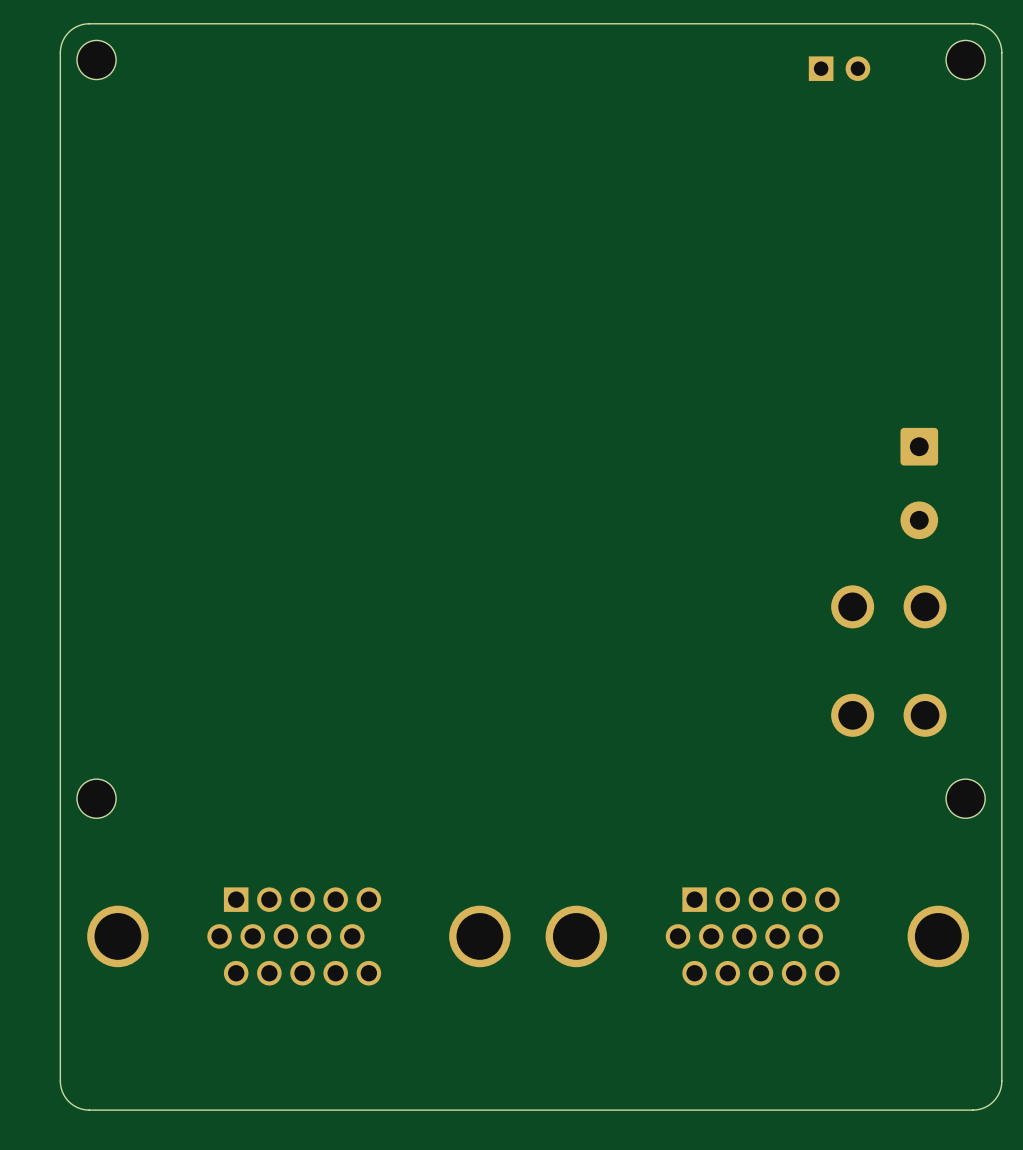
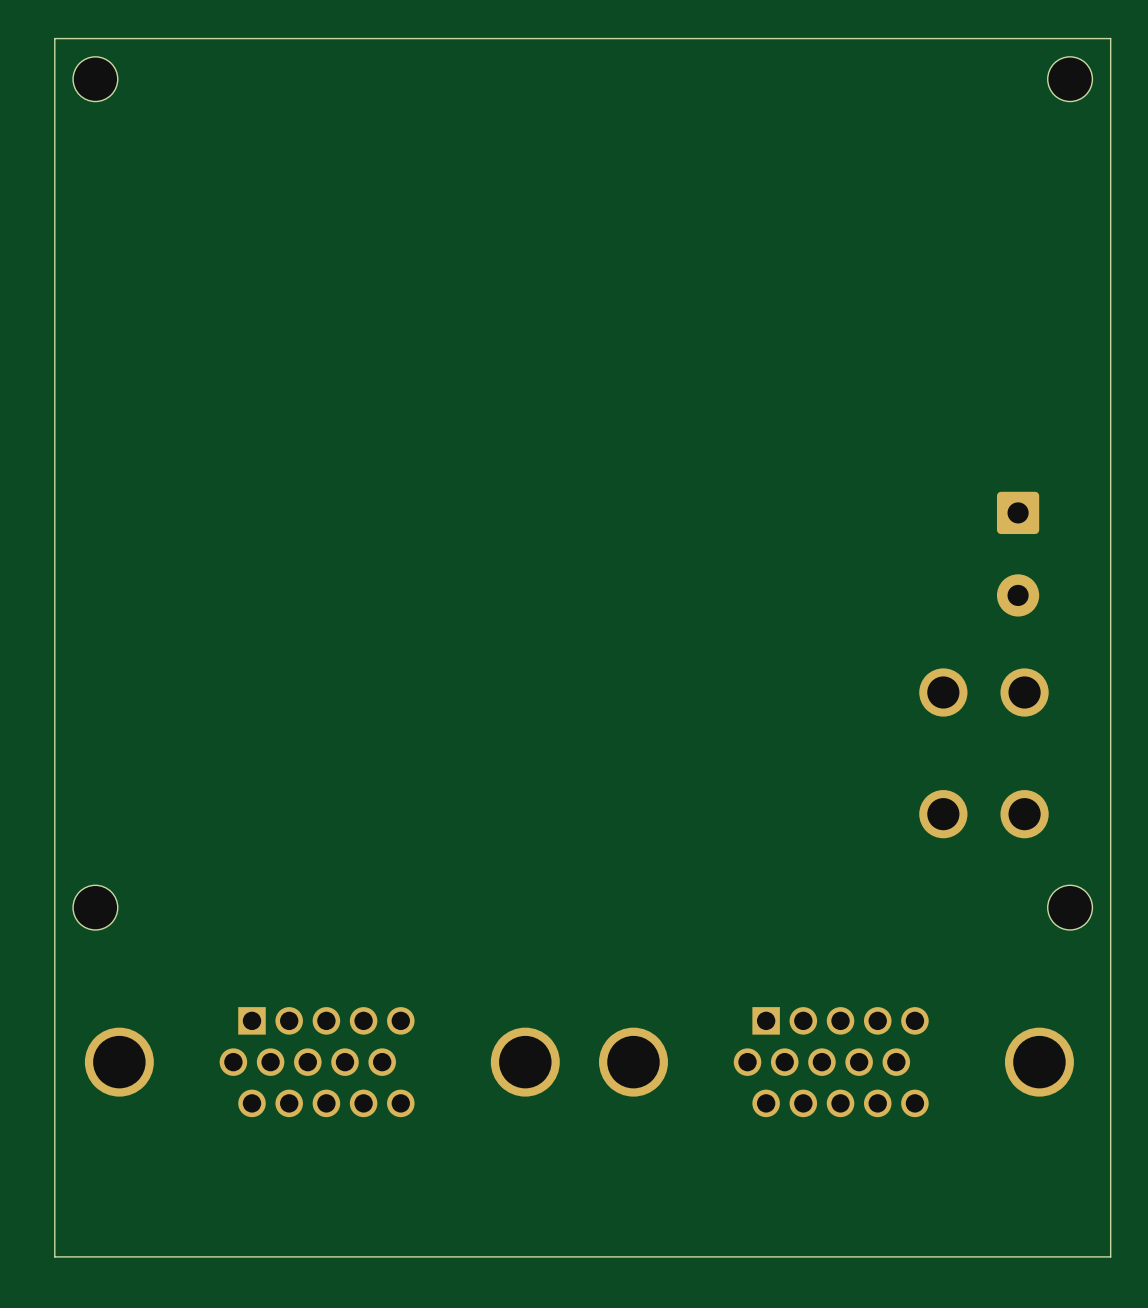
board edge: (972, 23) (89, 23) (76, 26) (66, 34) (61, 43) (60, 52) (60, 1081) (63, 1093) (71, 1103) (79, 1108) (89, 1110) (972, 1110) (985, 1107) (995, 1099) (1000, 1090) (1001, 1081) (1001, 52) (998, 40) (993, 32) (985, 26) (972, 23) -> none
part: (96, 59) -> none
part: (965, 59) -> none
part: (839, 68) -> none
part: none -> (582, 647)
part: (96, 798) -> none
part: (965, 798) -> none

